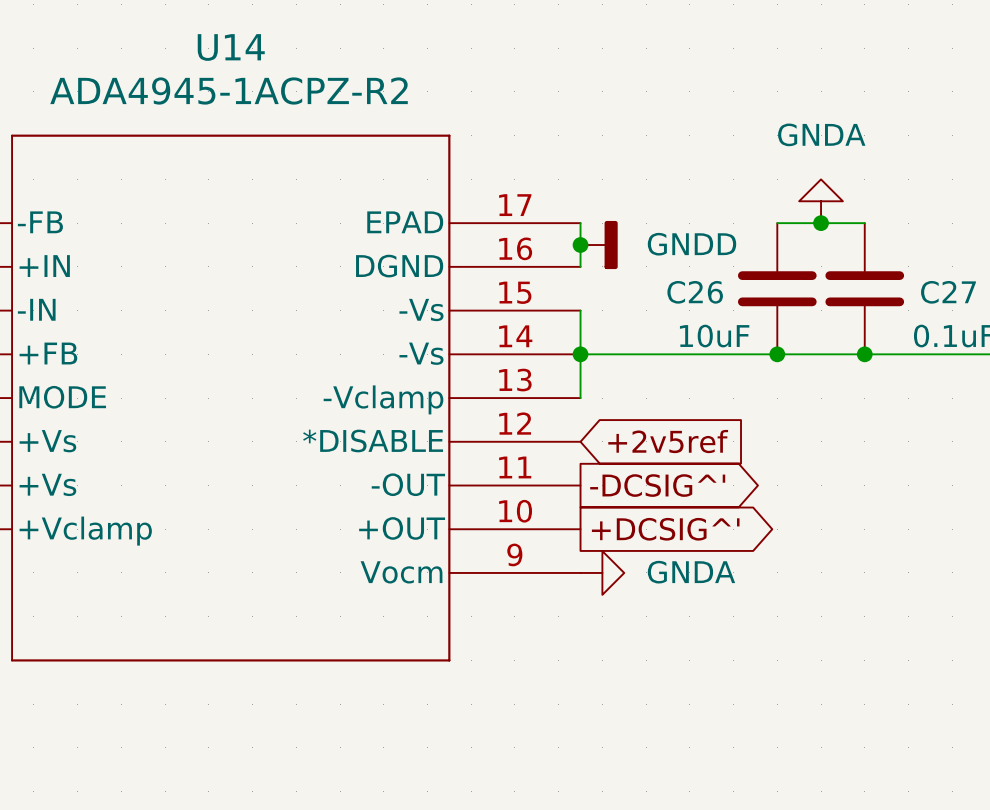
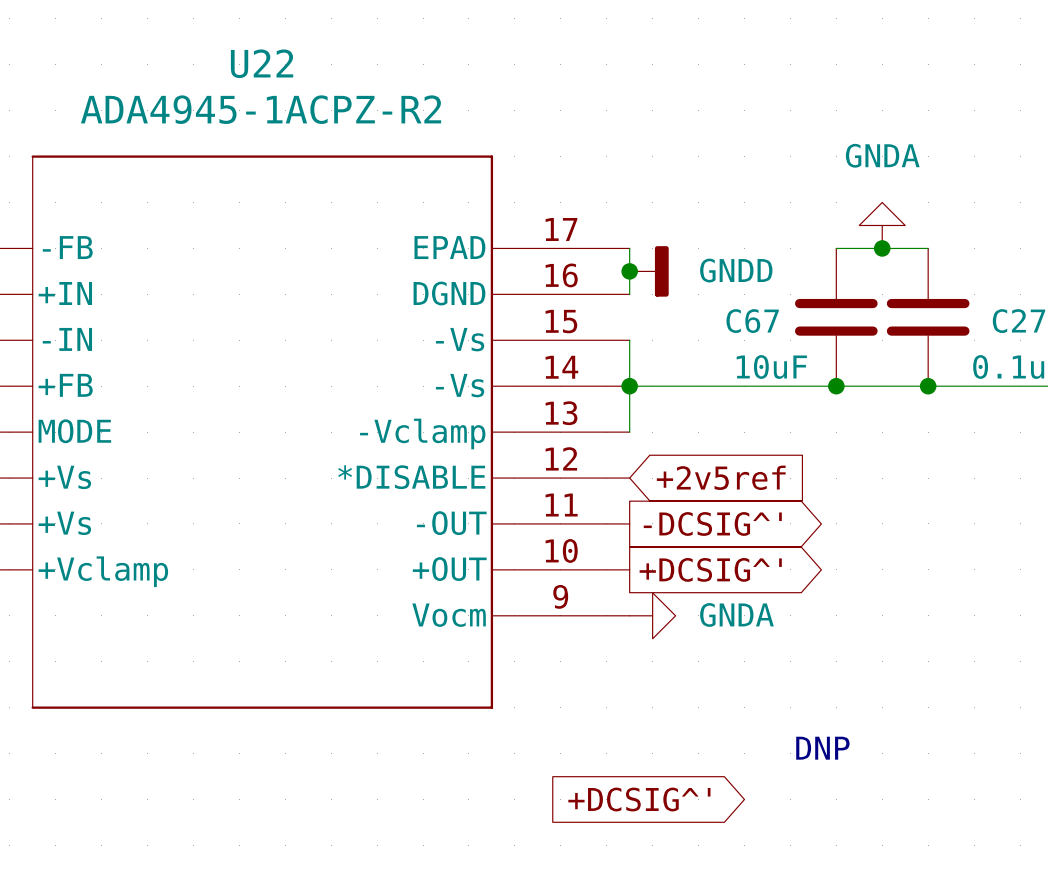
U14 name: U14 (231, 47) -> U22 (262, 63)
C26 name: C26 (695, 292) -> C67 (752, 321)
text: none -> DNP (822, 748)
global label: none -> +DCSIG^' (639, 799)

